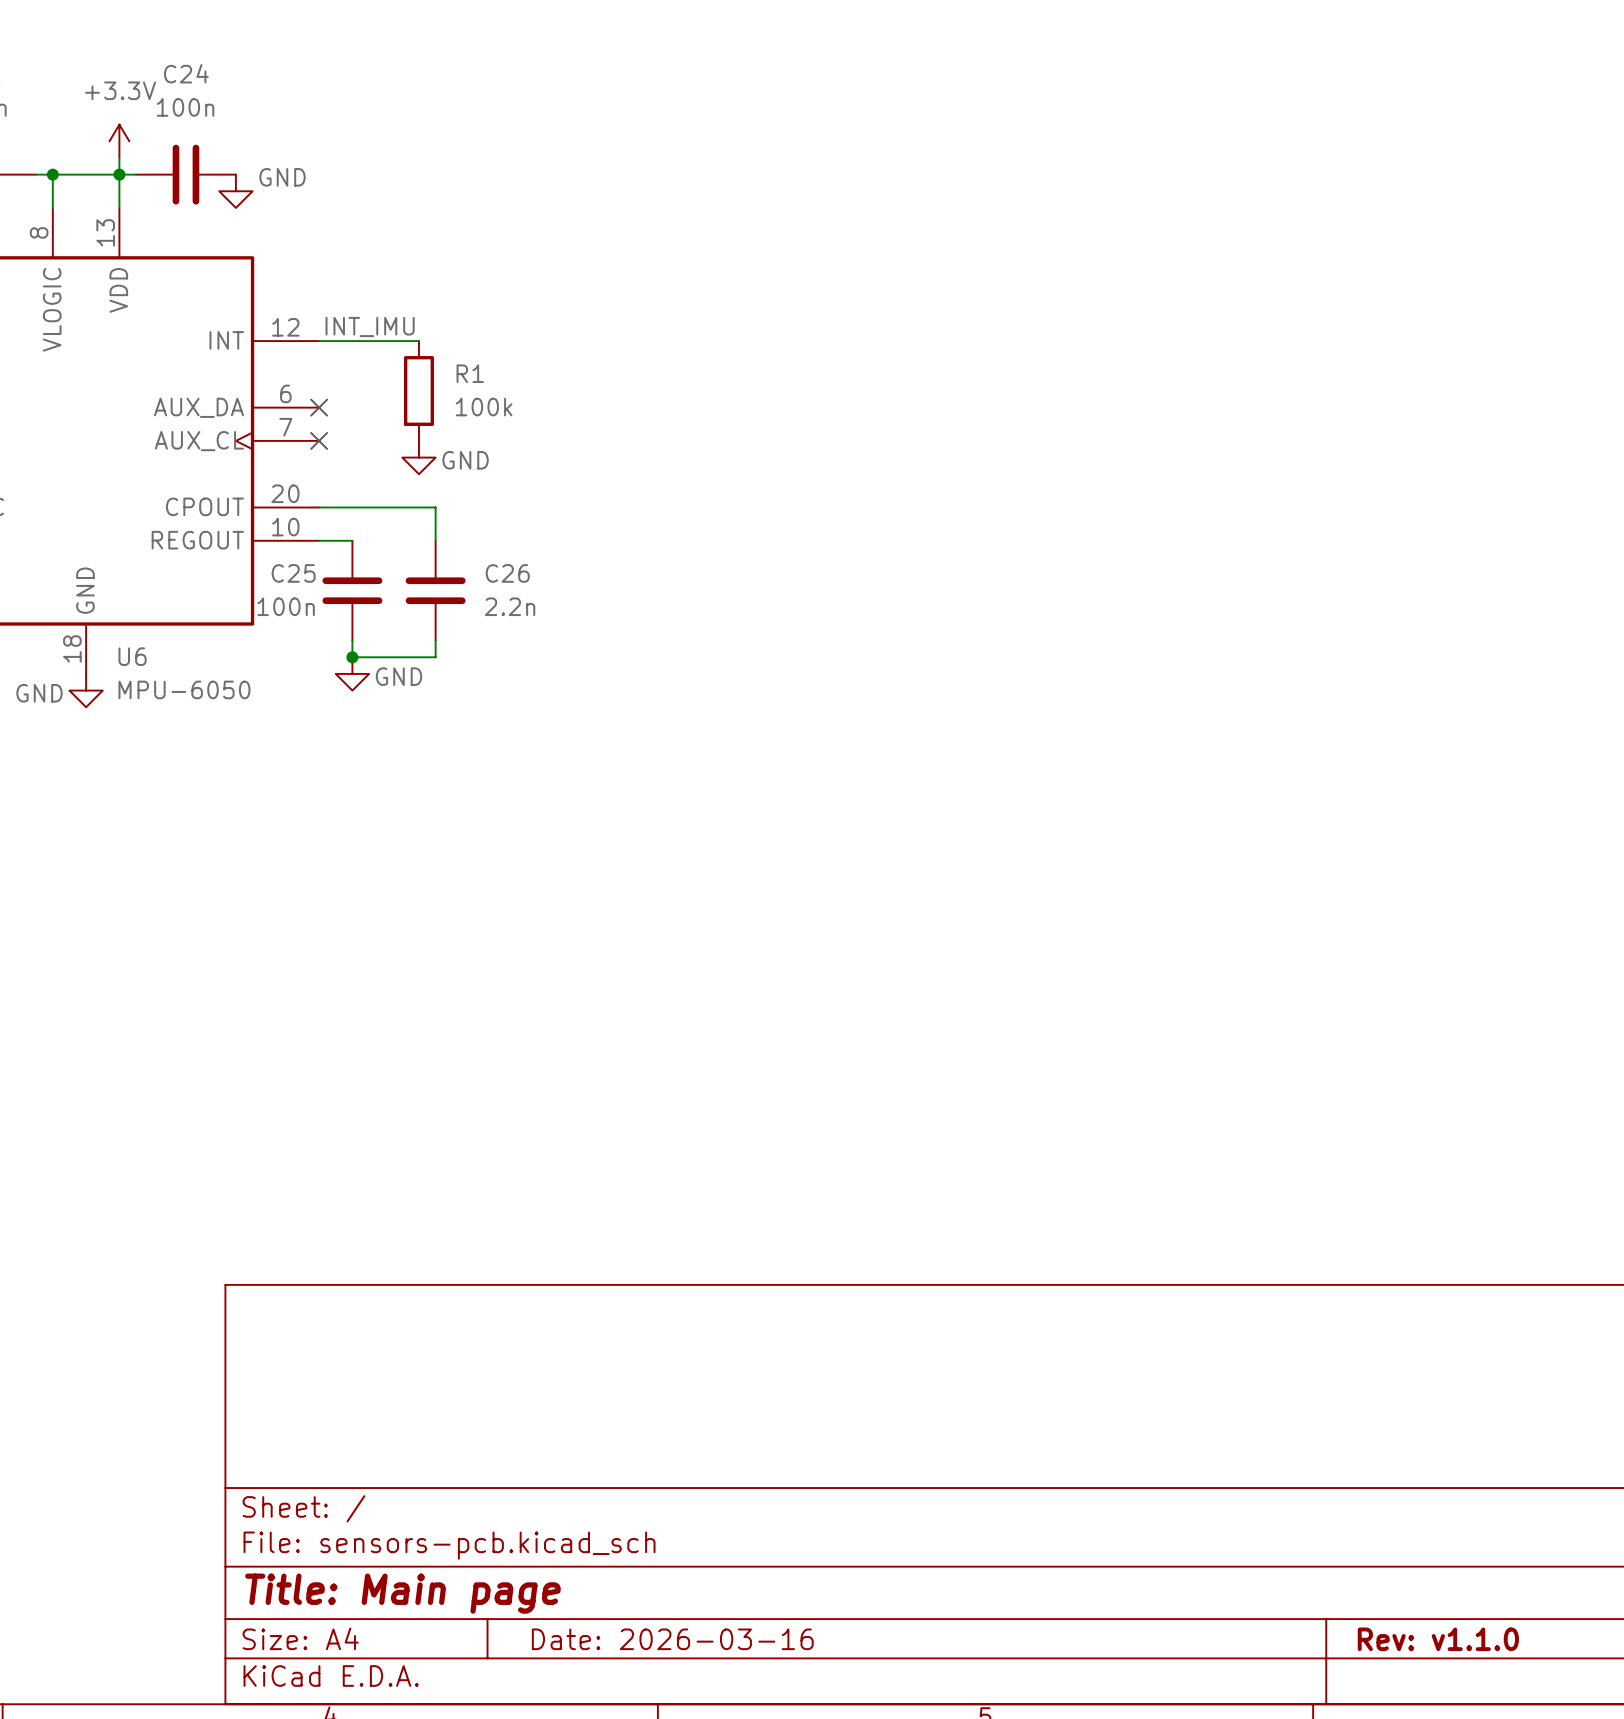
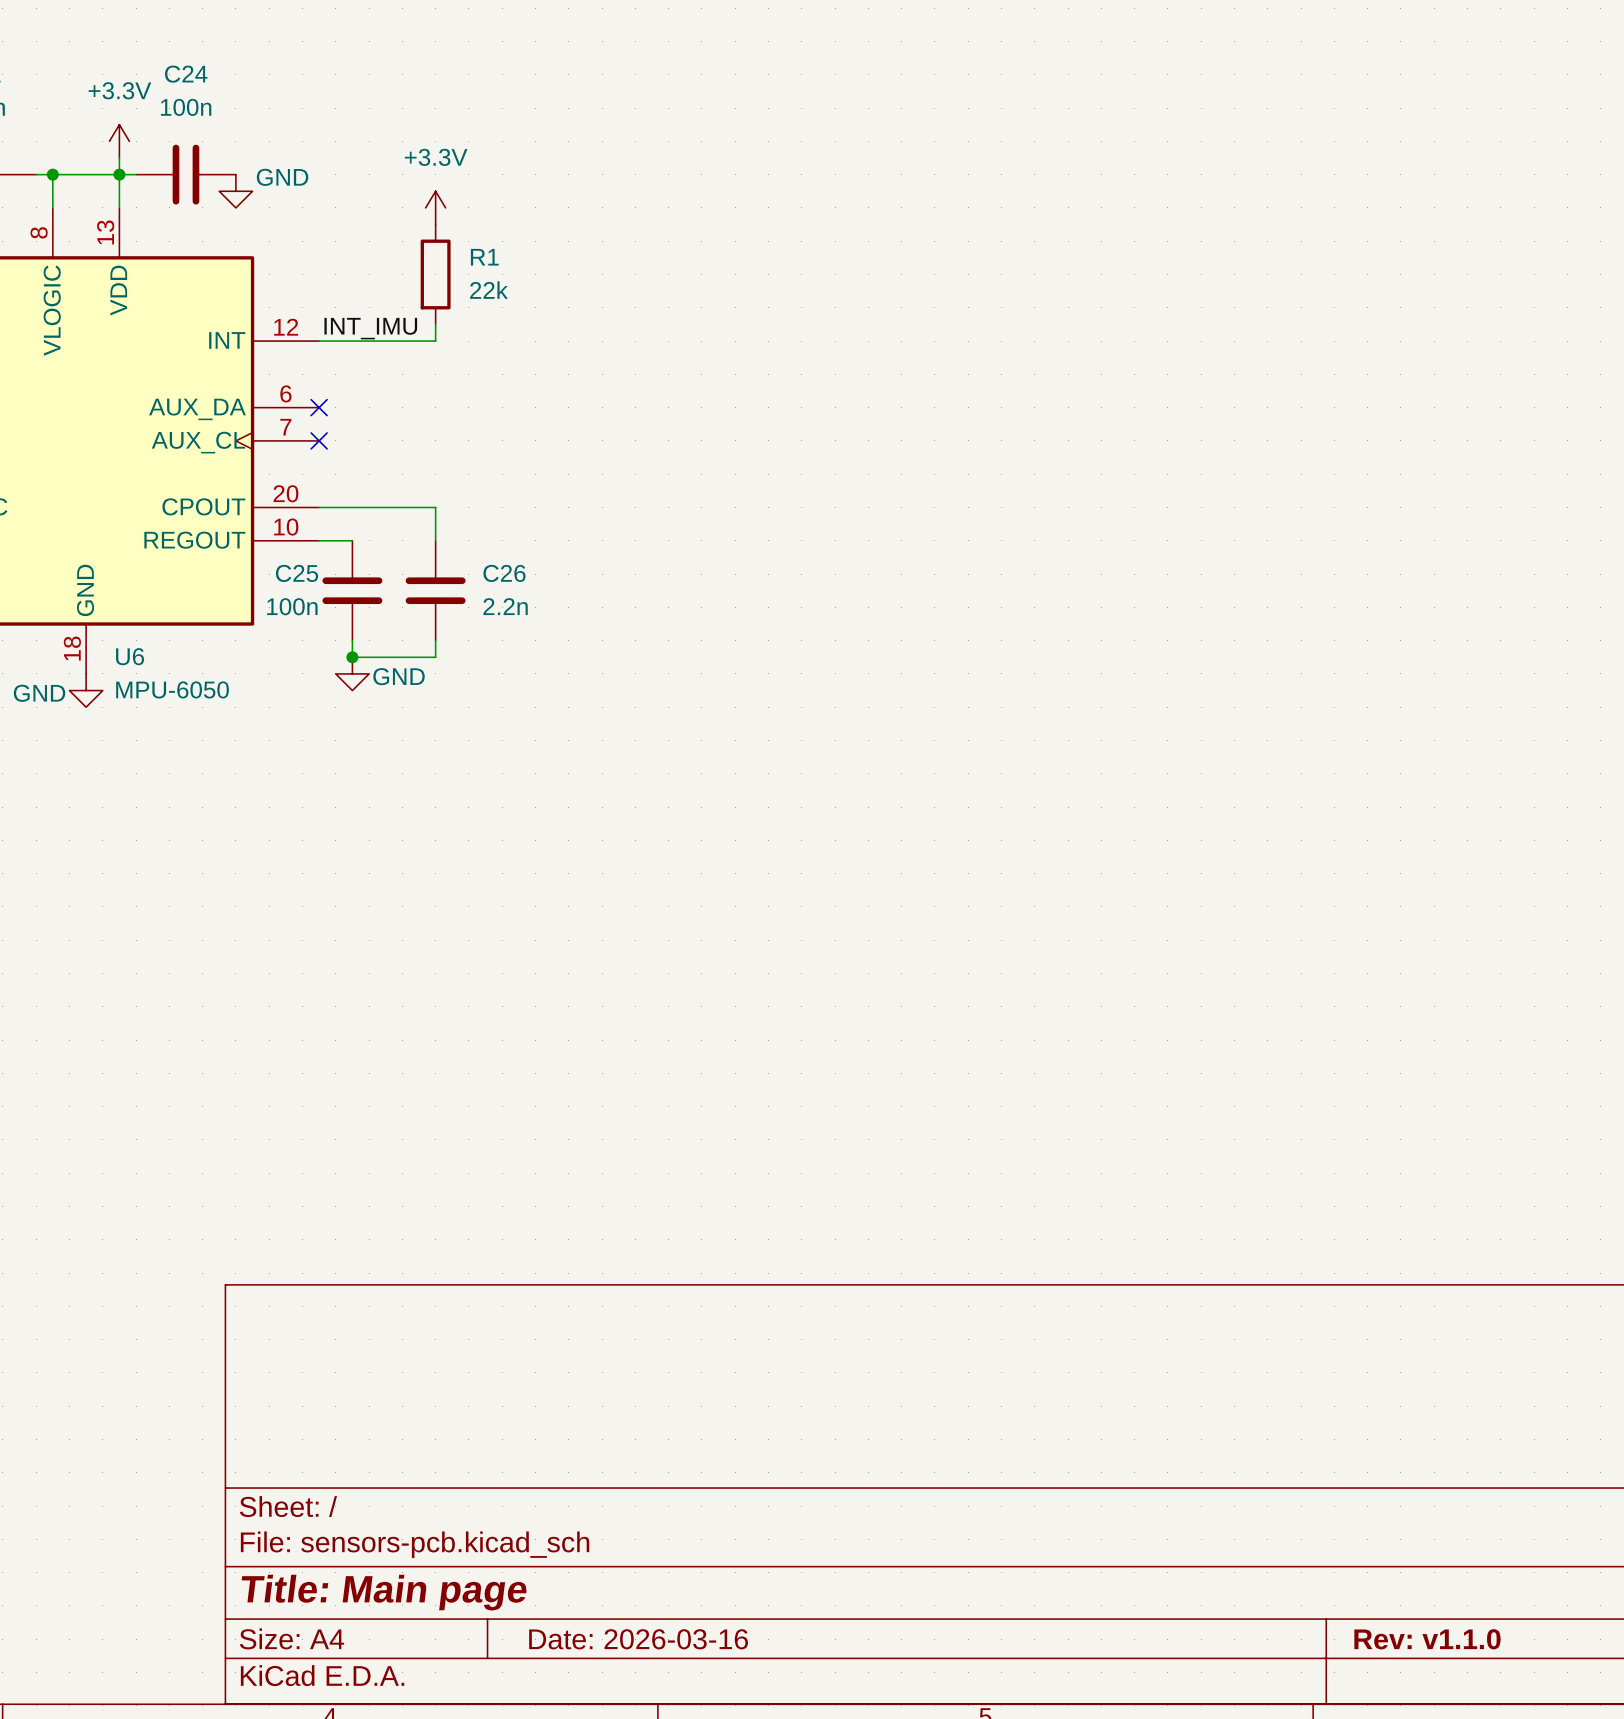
power symbol: none -> +3.3V (435, 207)
wire: none -> (435, 324) (435, 341) (418, 341)
R1 position: (418, 390) -> (435, 274)
R1 value: 100k (484, 407) -> 22k (489, 290)
power symbol: GND (418, 457) -> none

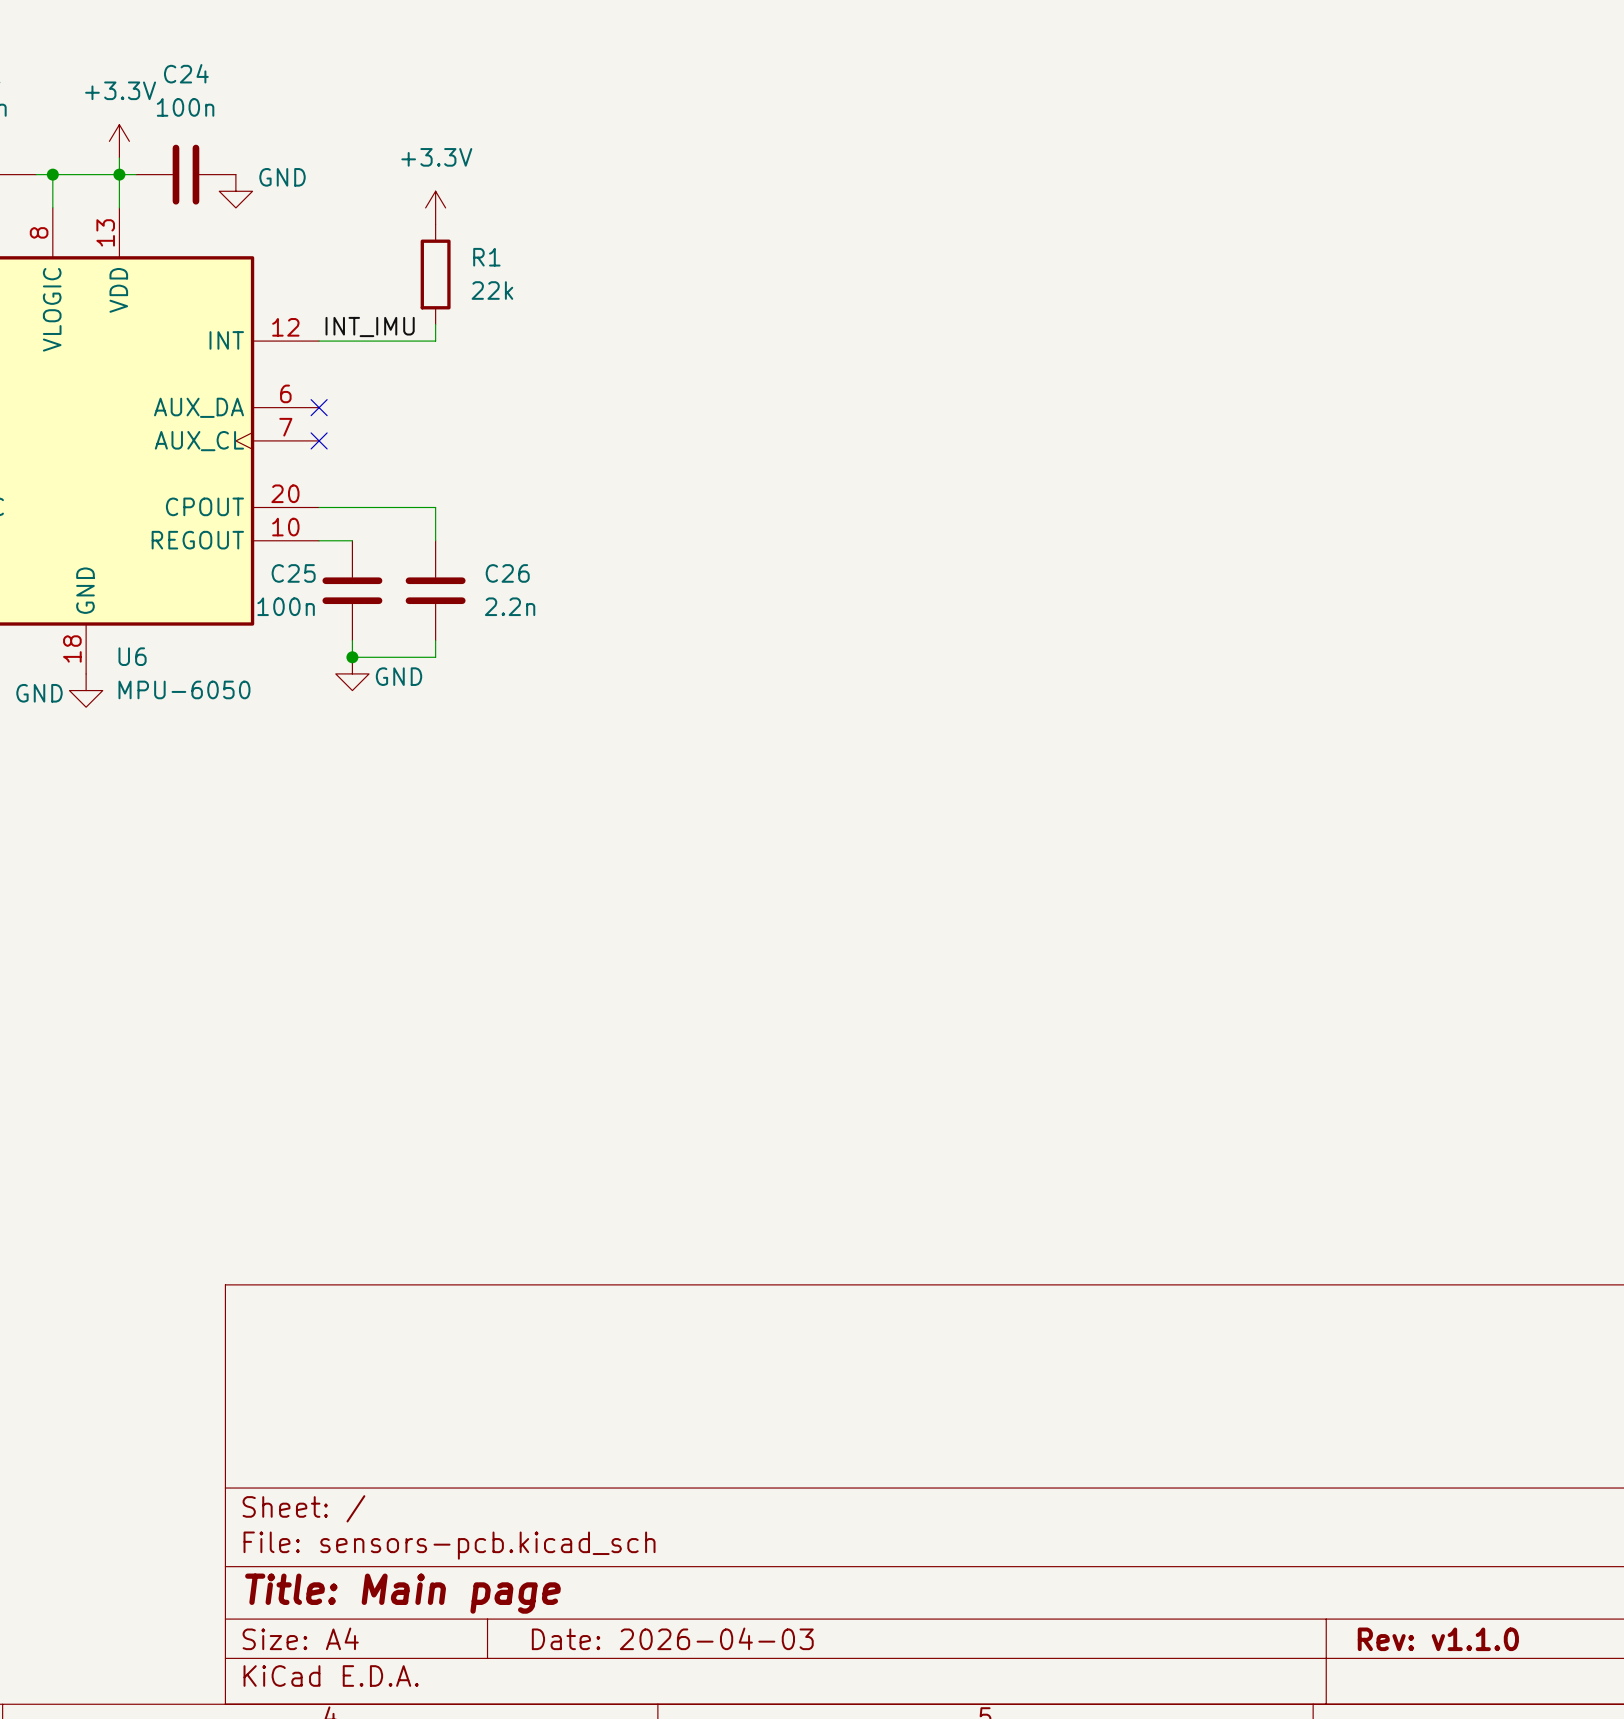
title block: Date: 2026-03-16 (638, 1639) -> Date: 2026-04-03 (672, 1638)

